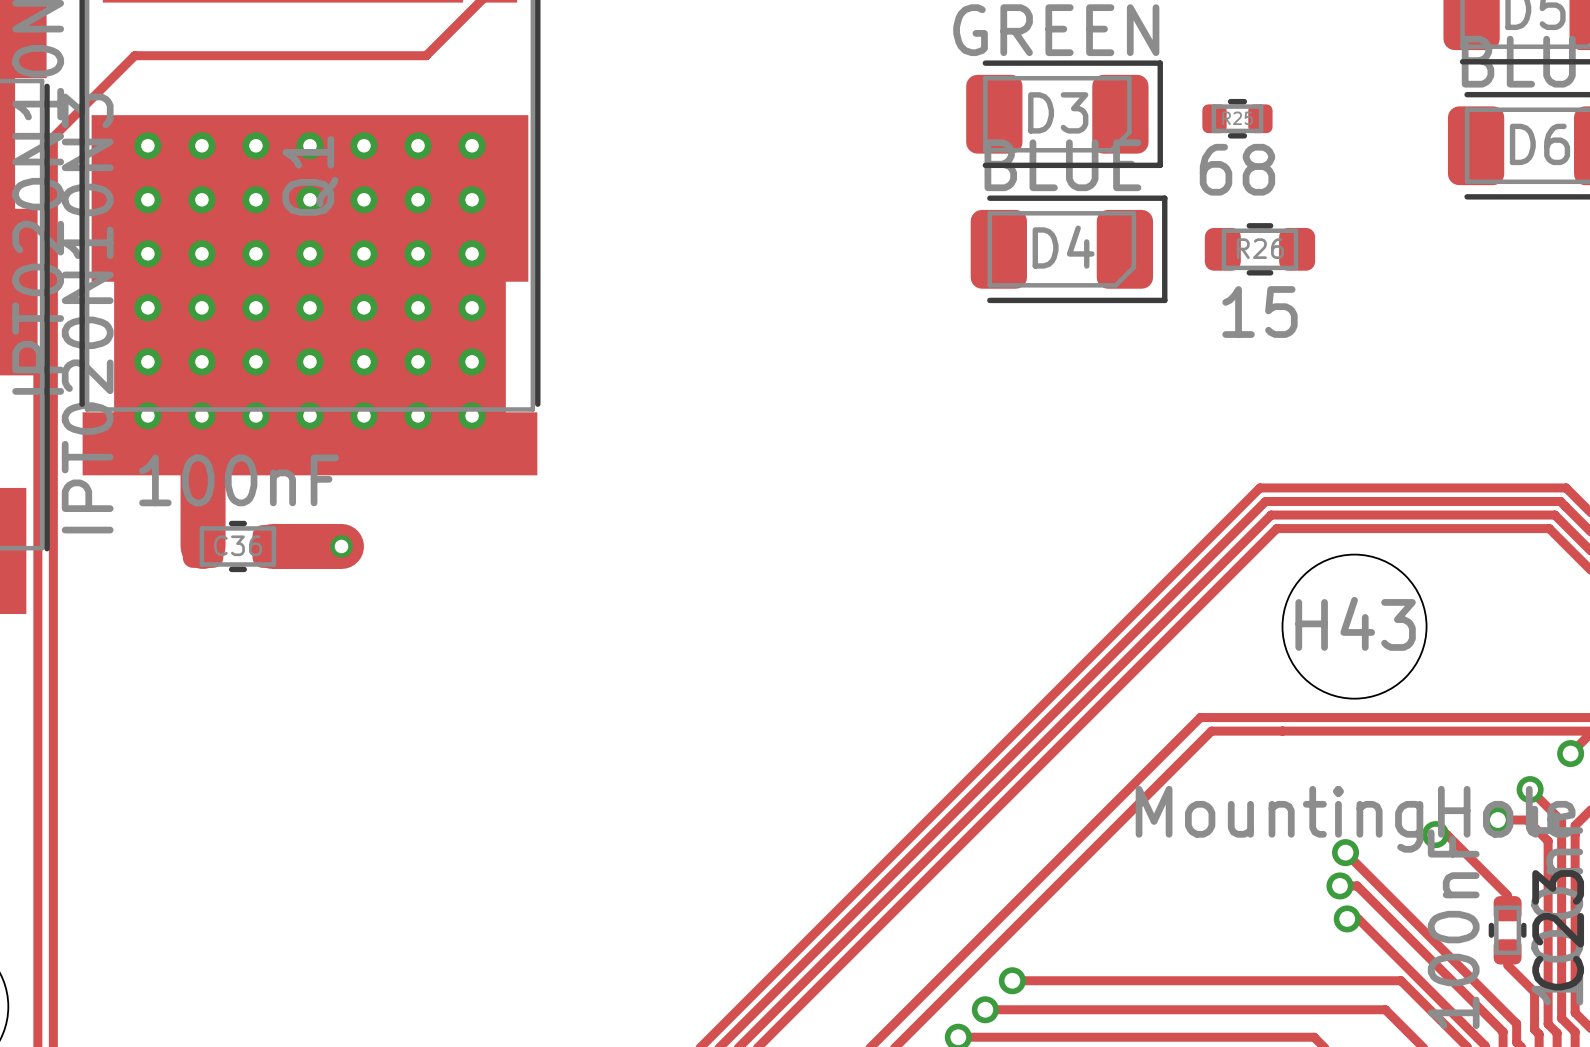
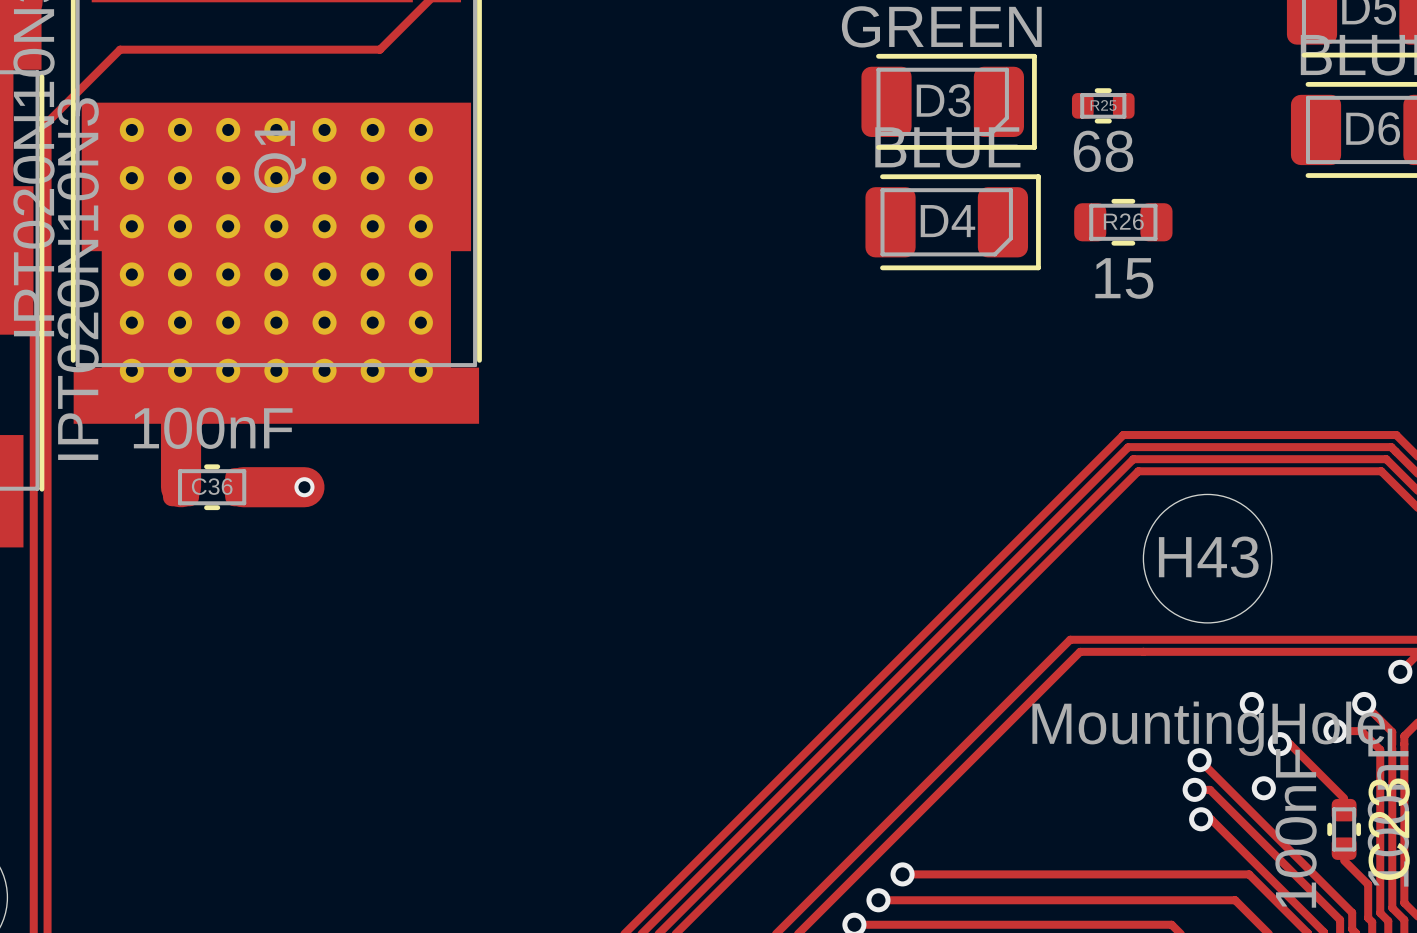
via: none -> (1251, 703)
via: none -> (1263, 788)

